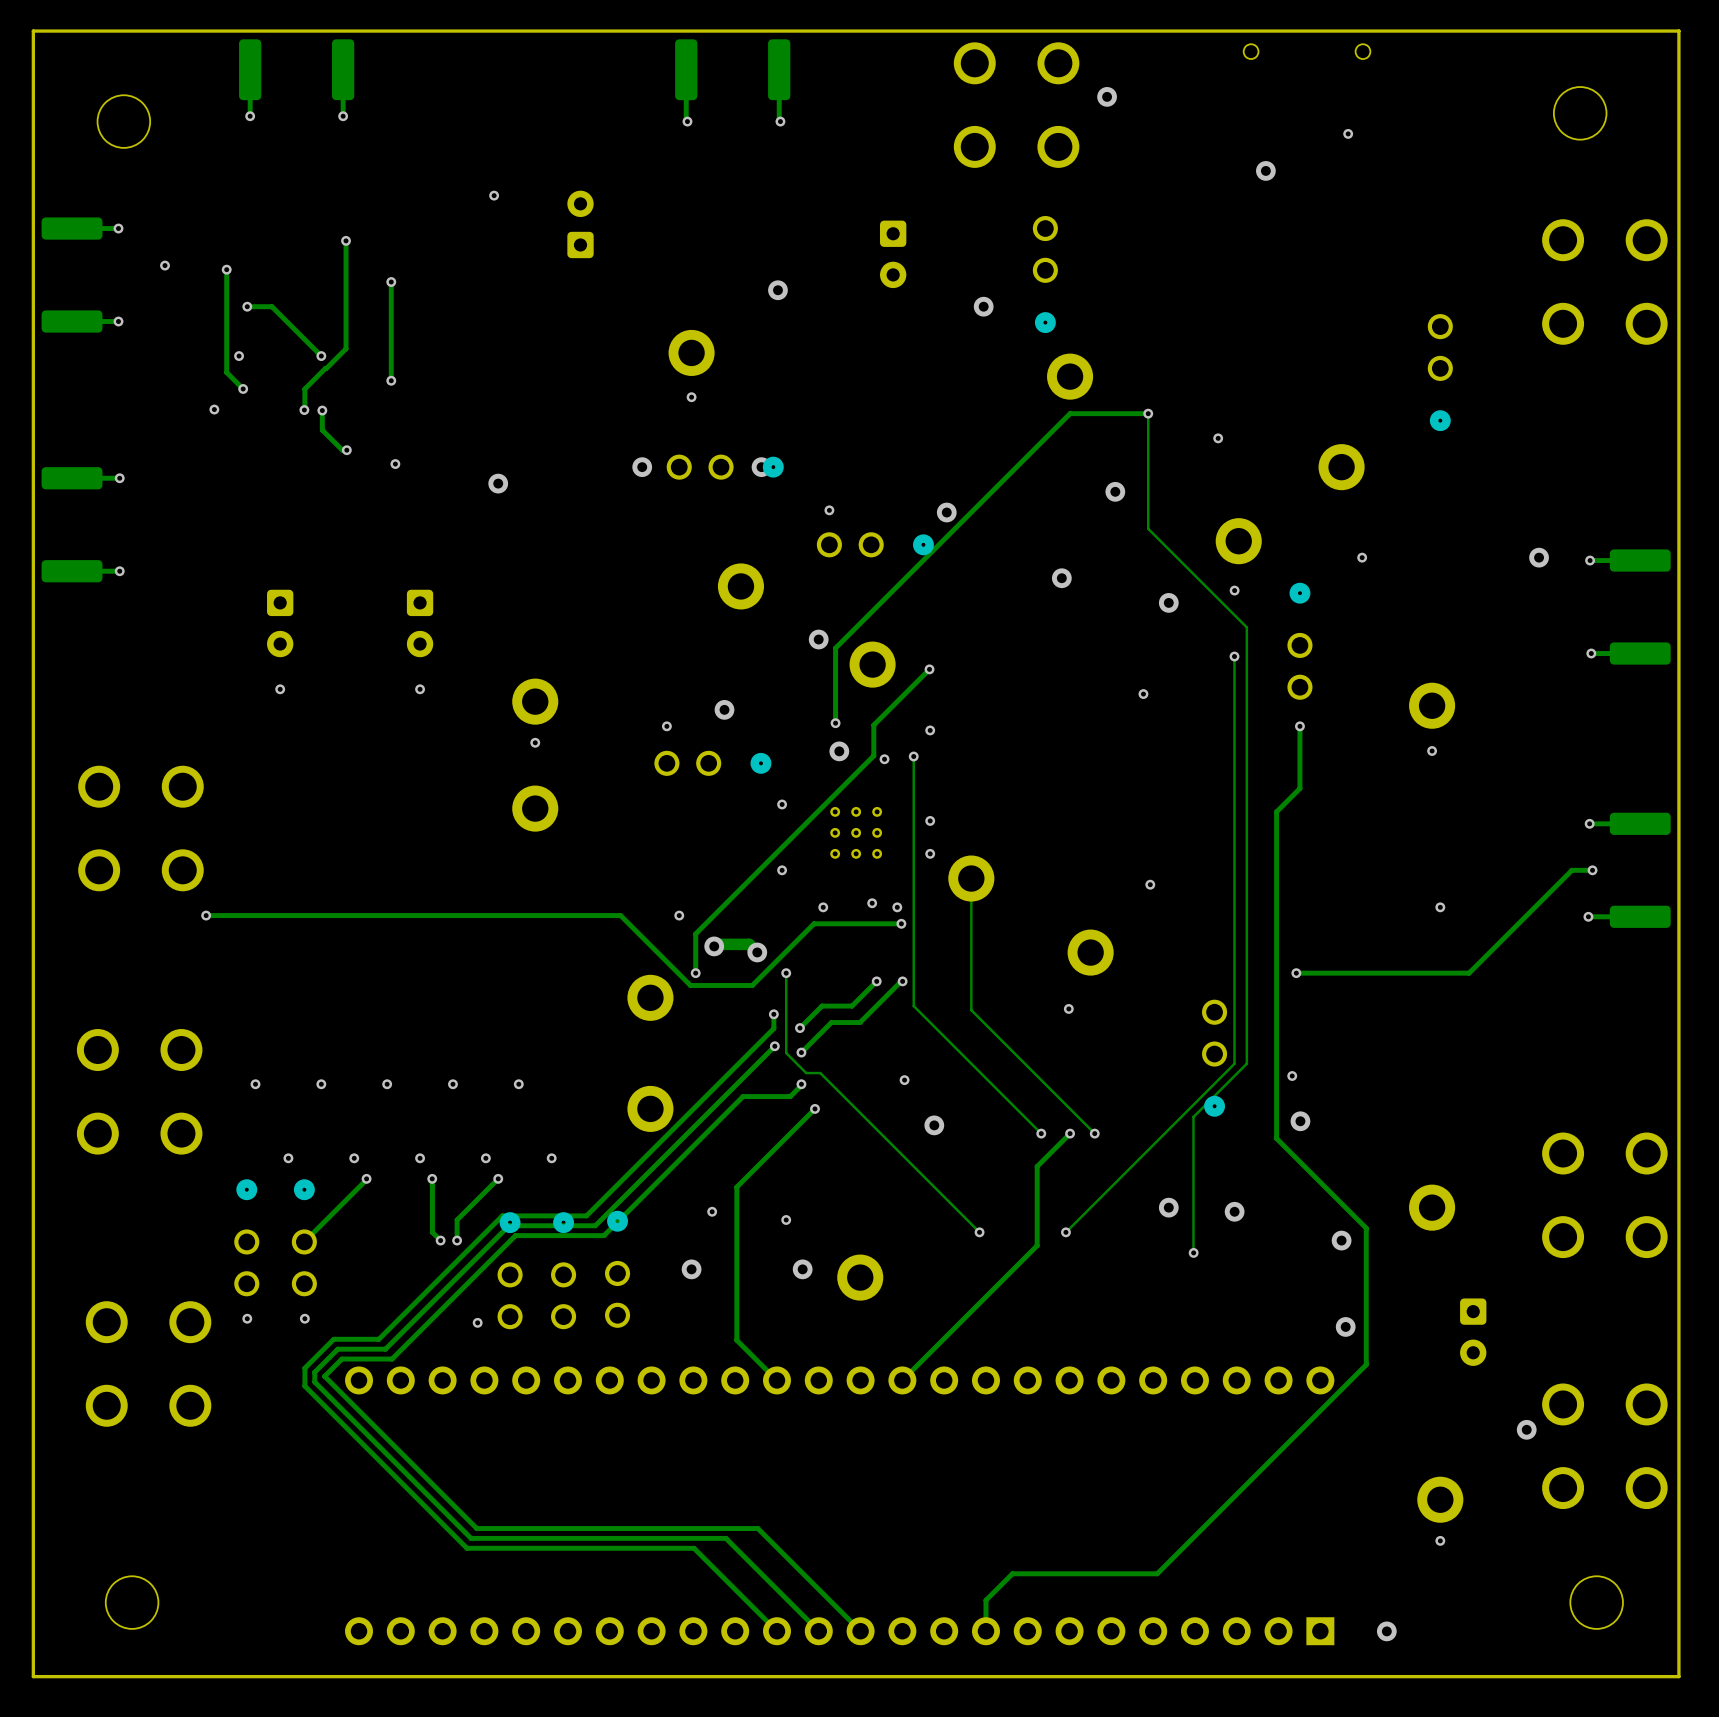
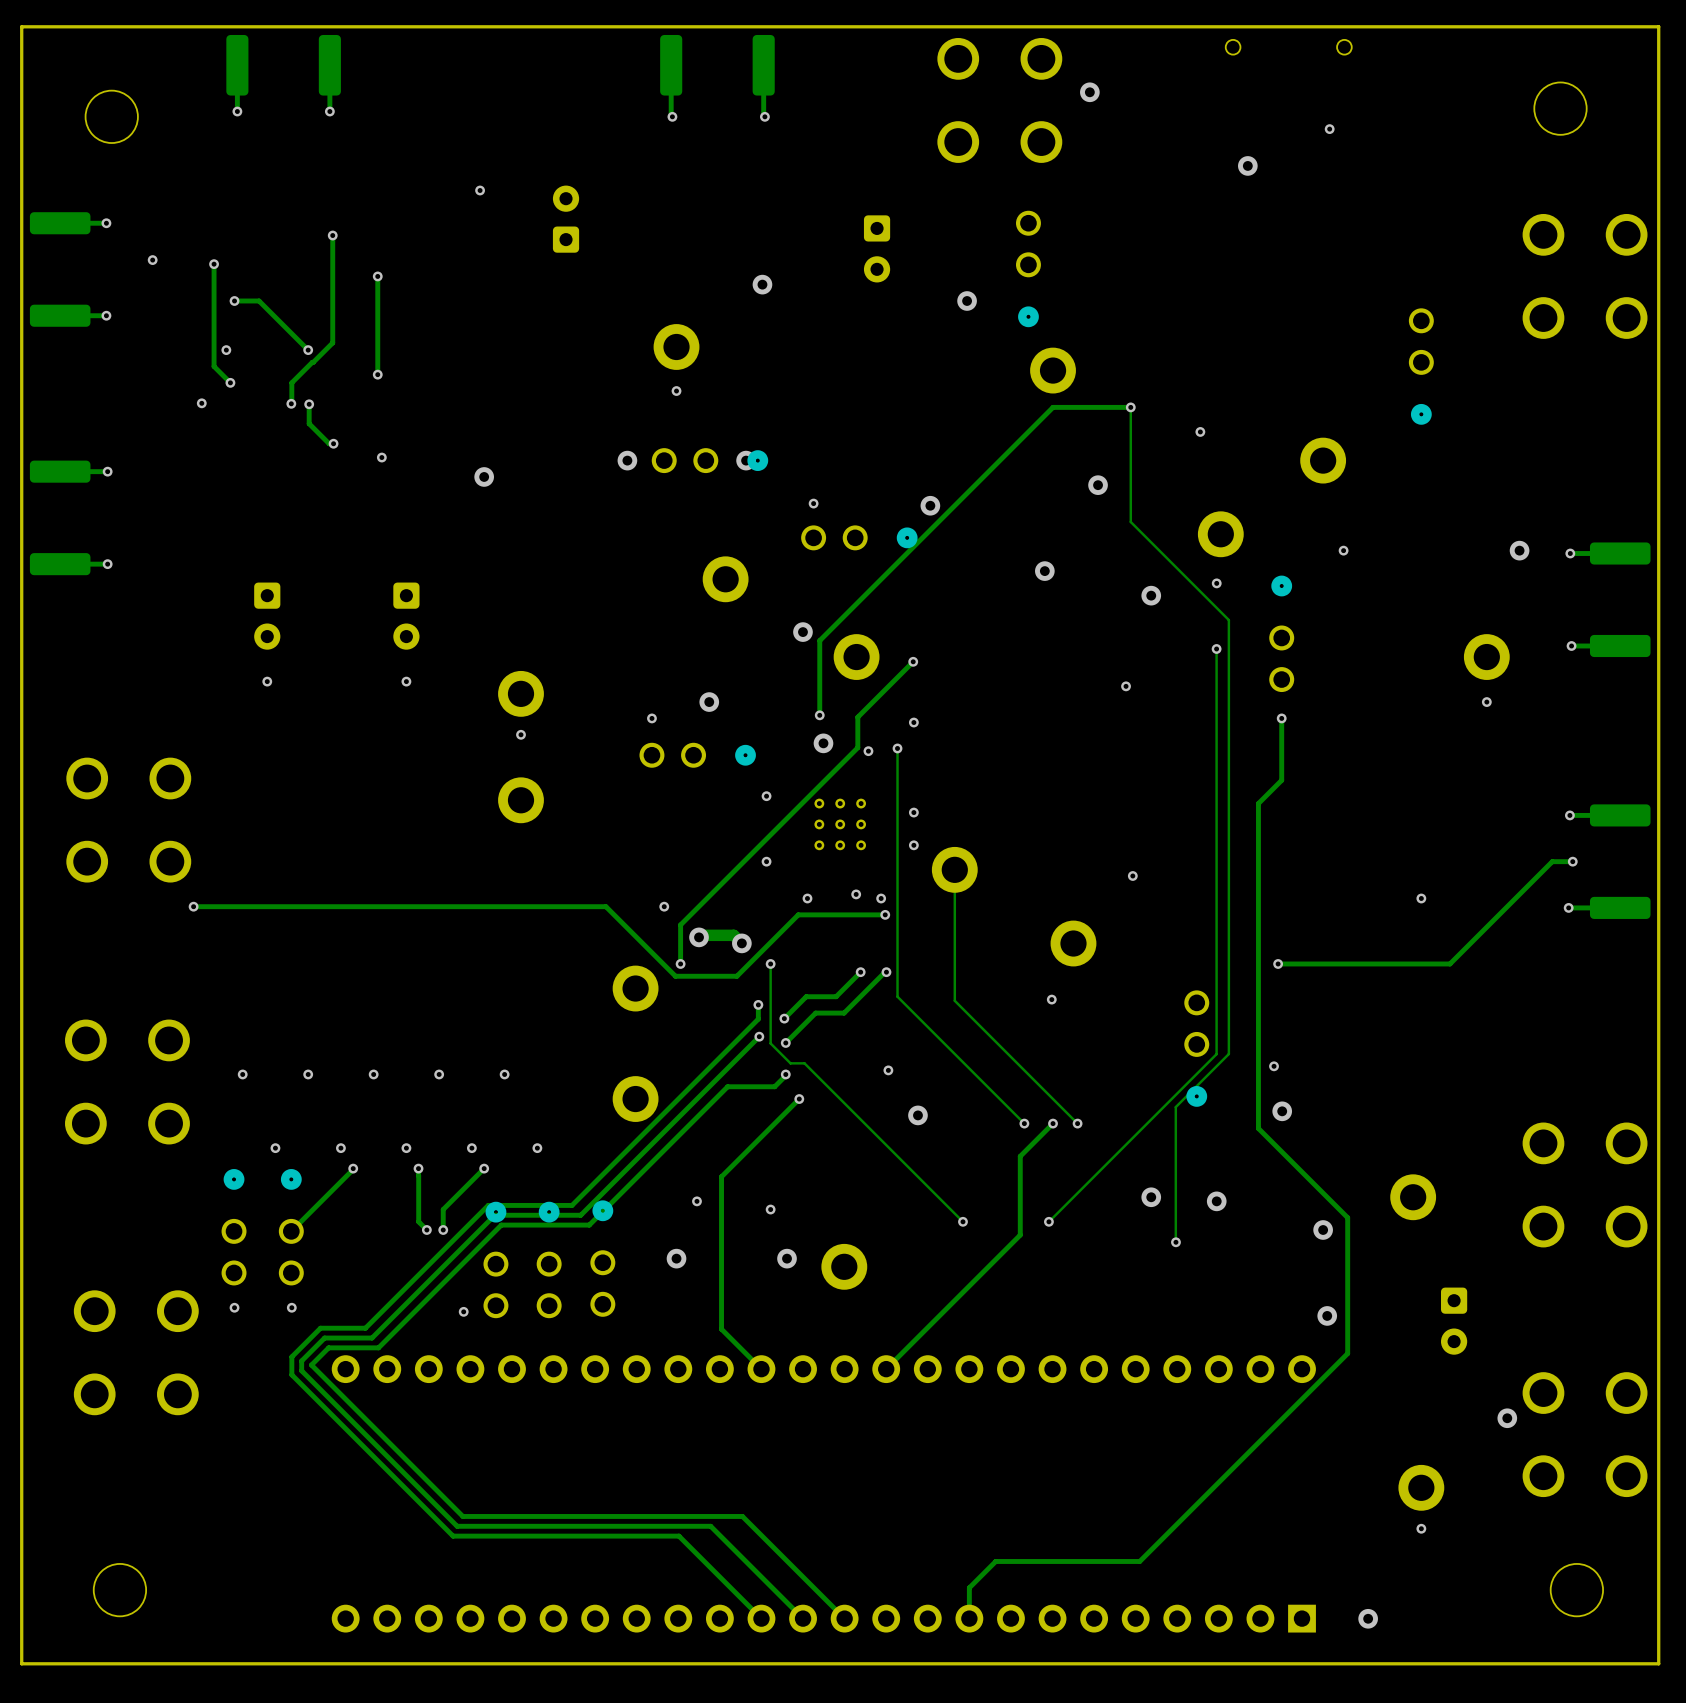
part position: (1432, 705) -> (1486, 657)
via position: (1432, 751) -> (1486, 702)

